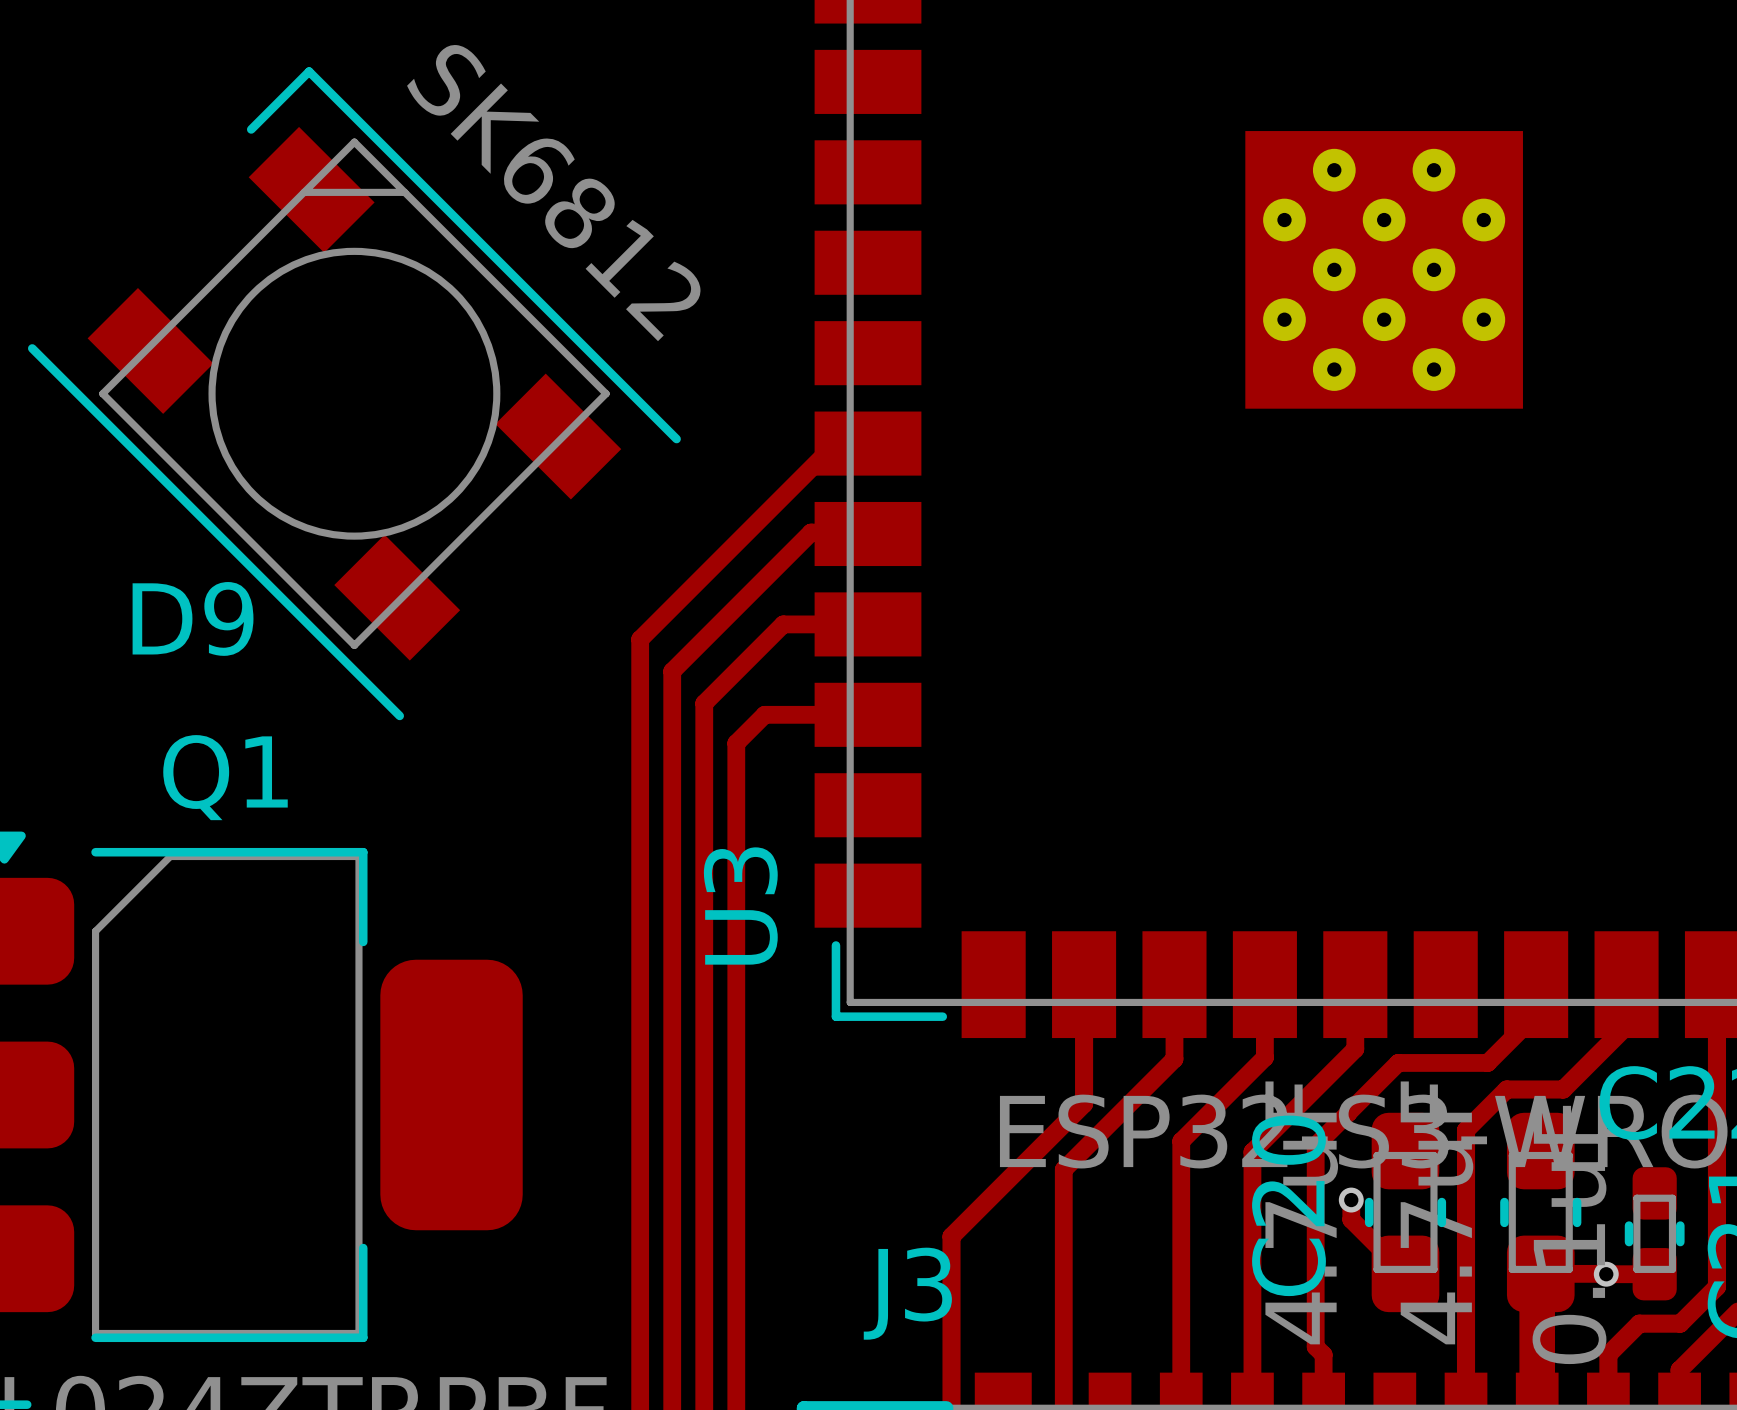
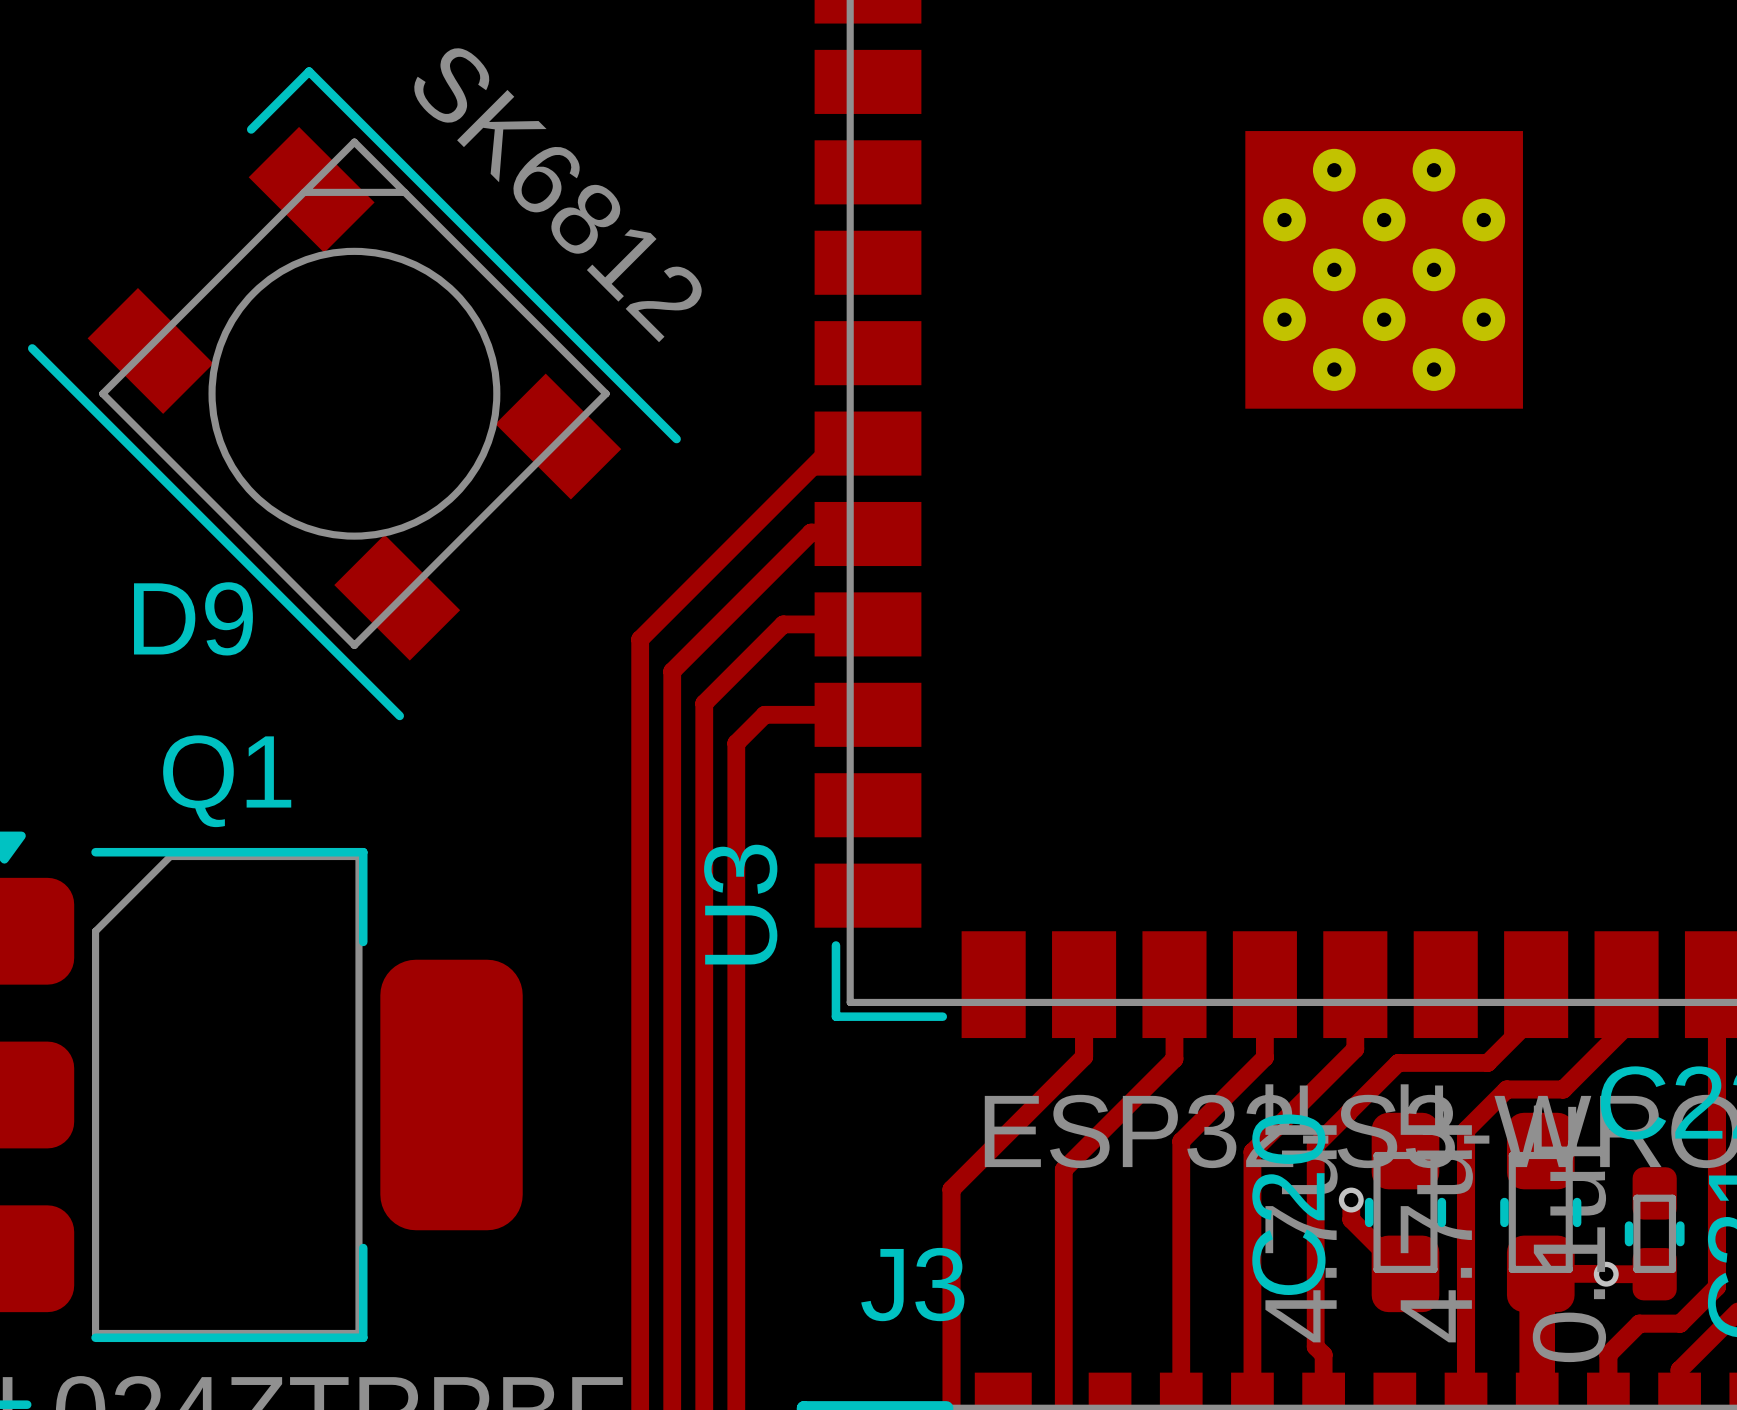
track: (1084, 1056) (1084, 1103) (951, 1236) -> (1084, 1056) (951, 1189) (951, 1236)

